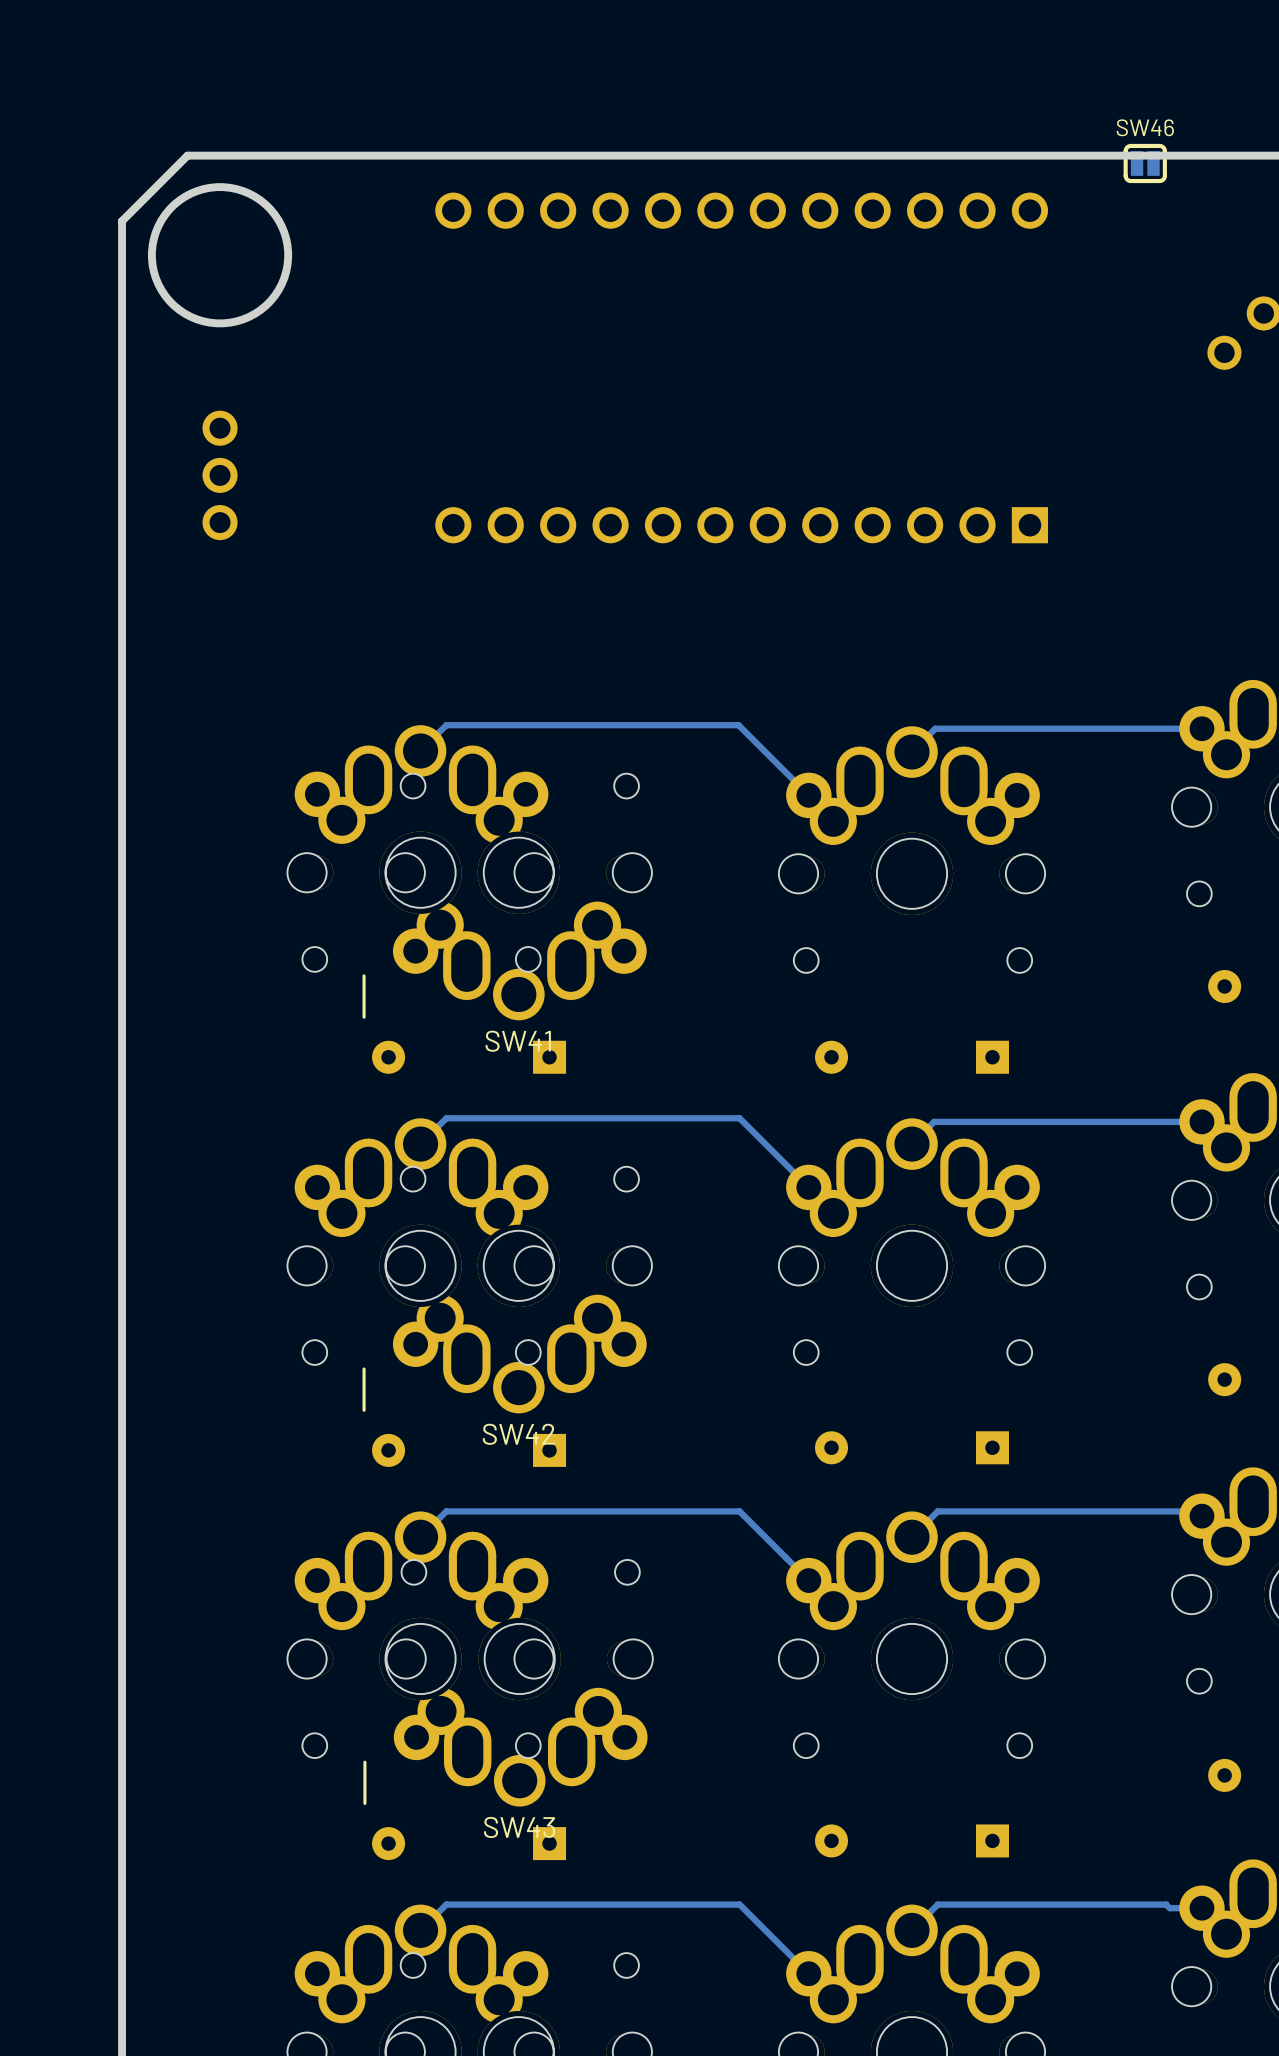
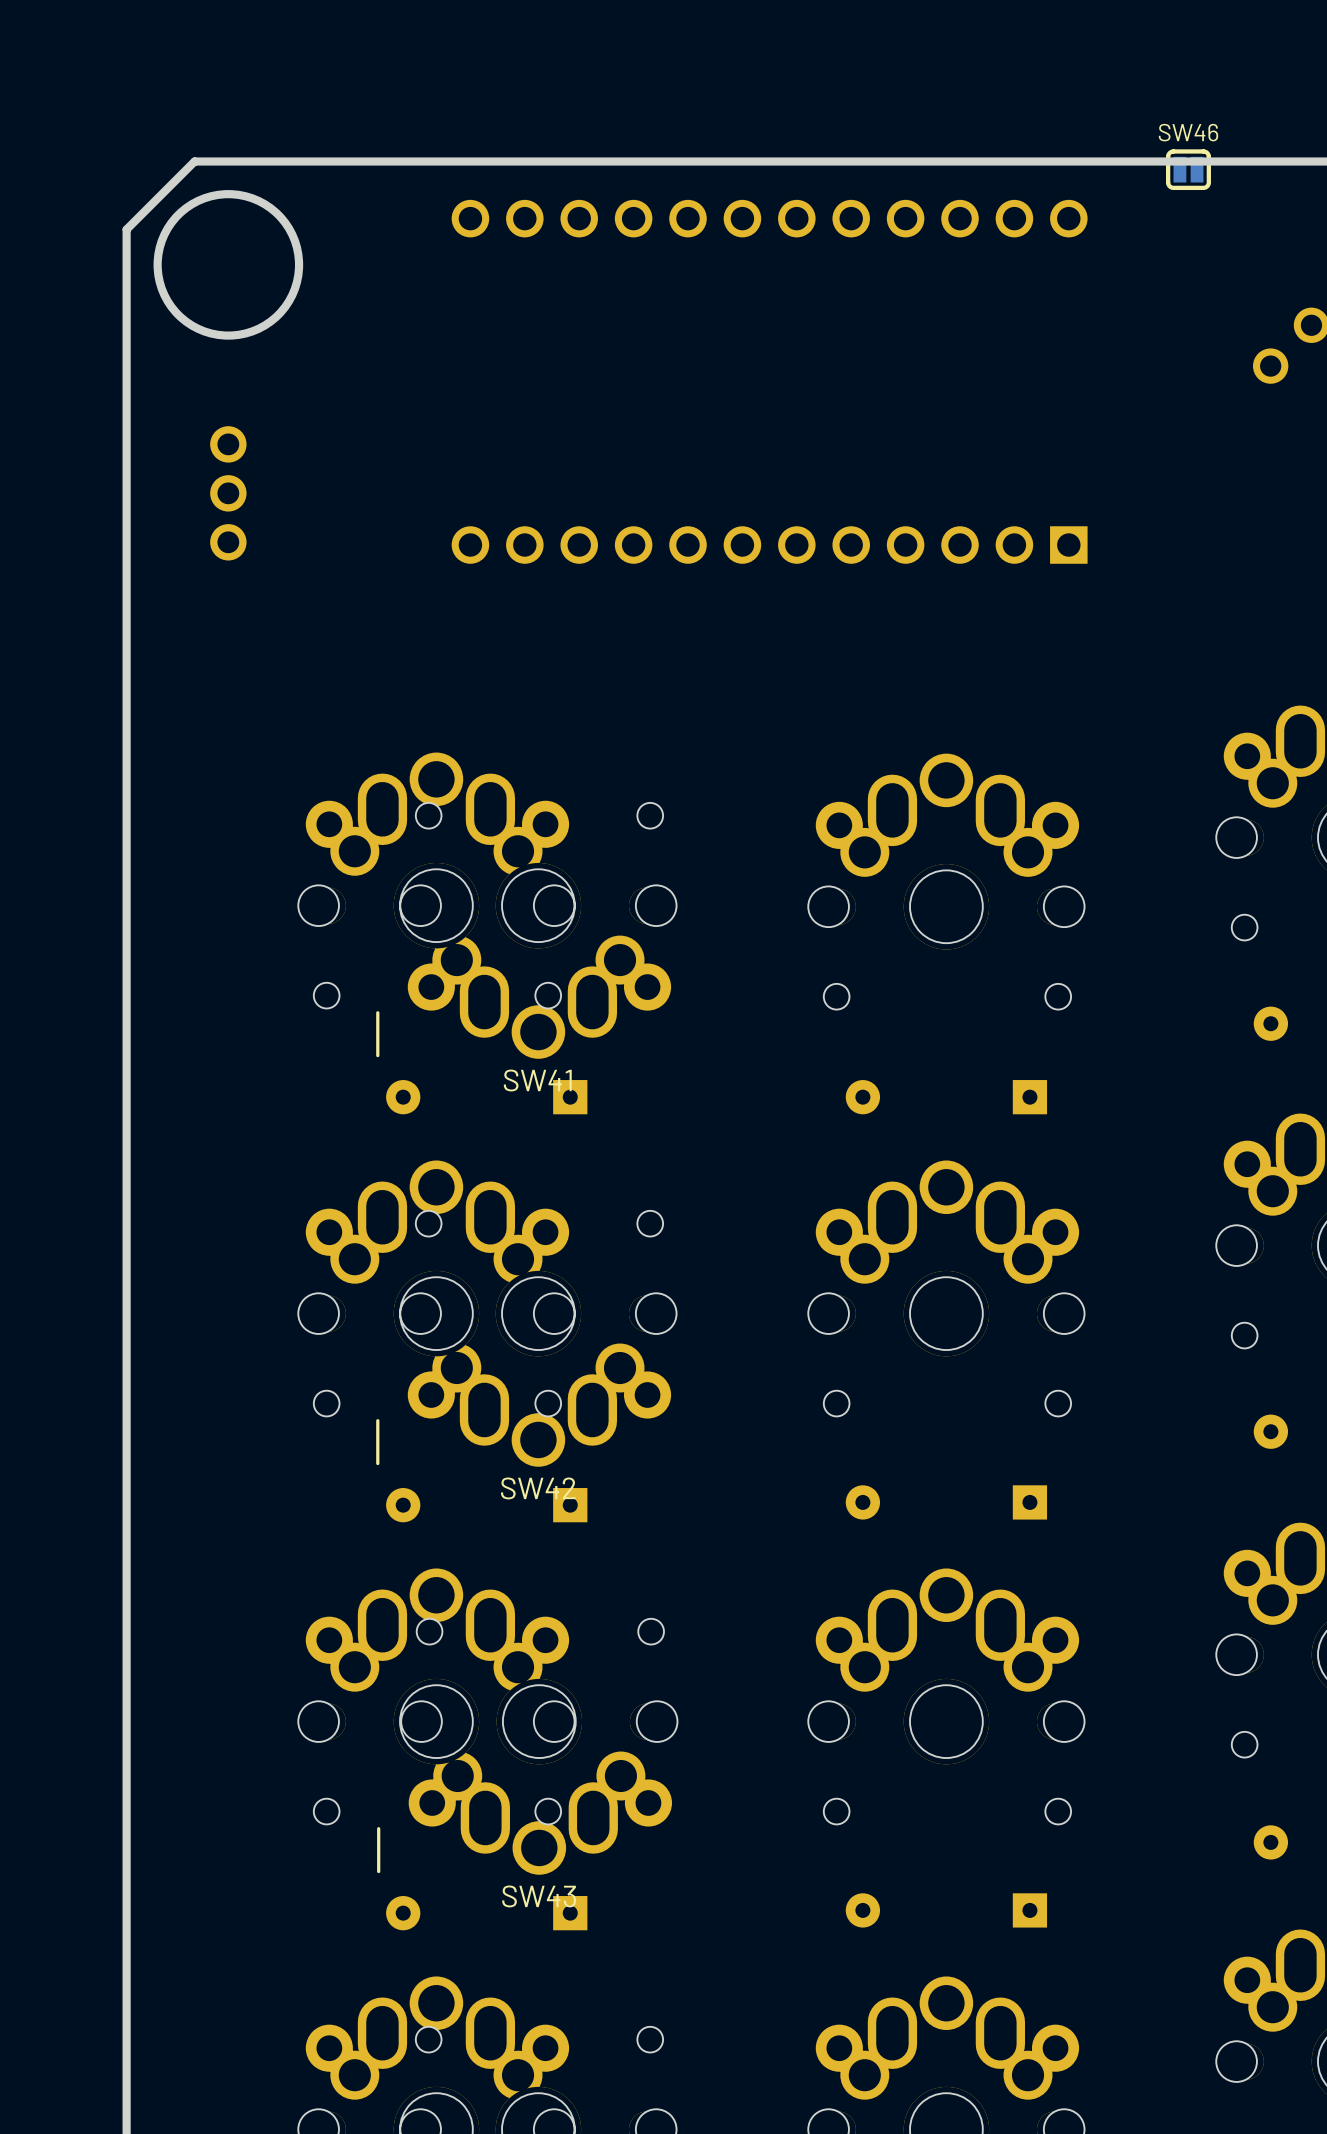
track: (1201, 728) (935, 728) (911, 752) -> none
track: (420, 750) (446, 725) (738, 725) (808, 795) -> none
track: (1201, 1121) (934, 1121) (911, 1144) -> none
track: (420, 1144) (446, 1118) (739, 1118) (808, 1187) -> none
track: (1201, 1516) (1197, 1511) (937, 1511) (911, 1537) -> none
track: (420, 1537) (446, 1511) (739, 1511) (808, 1580) -> none
track: (1201, 1908) (1169, 1908) (1166, 1904) (937, 1904) (911, 1930) -> none
track: (420, 1930) (446, 1904) (739, 1904) (808, 1973) -> none

